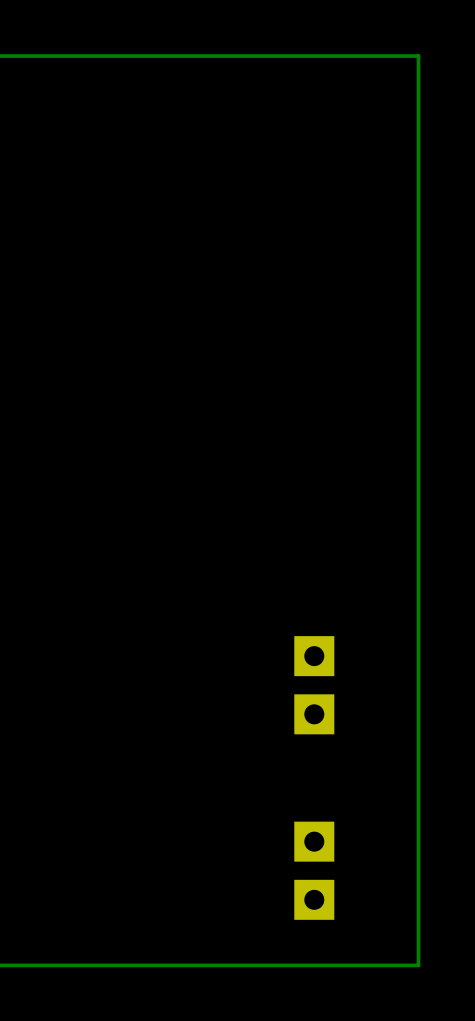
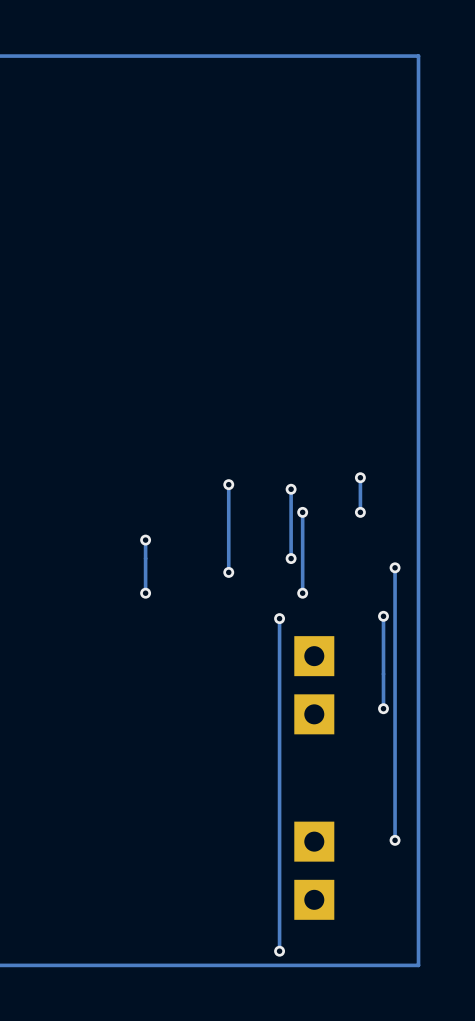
track: none -> (360, 477) (360, 512)
via: none -> (360, 477)
track: none -> (228, 484) (228, 572)
via: none -> (228, 484)
track: none -> (291, 489) (291, 558)
via: none -> (291, 489)
track: none -> (302, 512) (302, 593)
via: none -> (302, 512)
via: none -> (360, 512)
track: none -> (145, 540) (145, 593)
via: none -> (145, 540)
via: none -> (291, 558)
track: none -> (395, 567) (395, 840)
via: none -> (395, 567)
via: none -> (228, 572)
via: none -> (145, 593)
via: none -> (302, 593)
track: none -> (383, 616) (383, 708)
via: none -> (383, 616)
track: none -> (279, 618) (279, 951)
via: none -> (279, 618)
via: none -> (383, 708)
via: none -> (395, 840)
via: none -> (279, 951)

